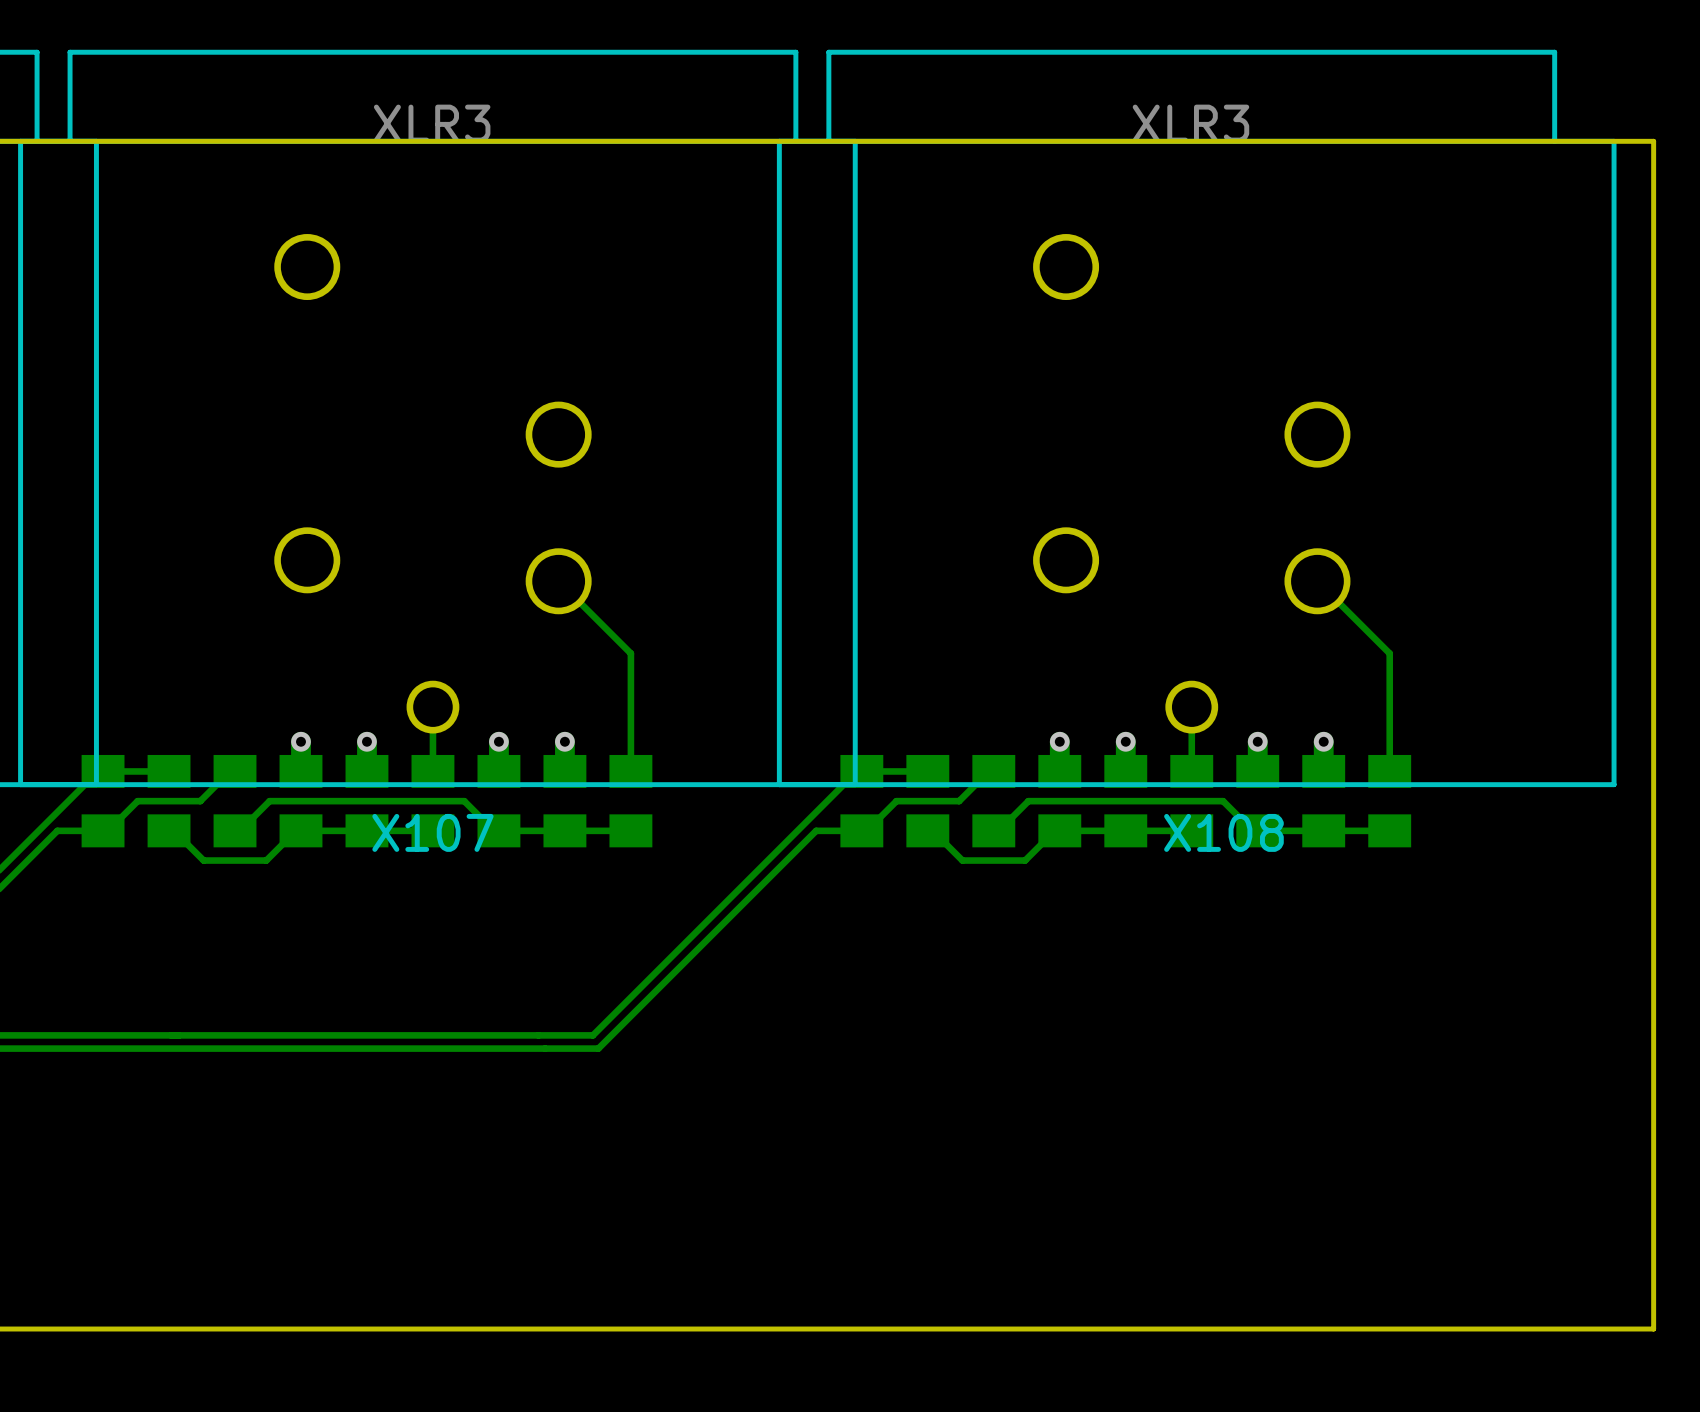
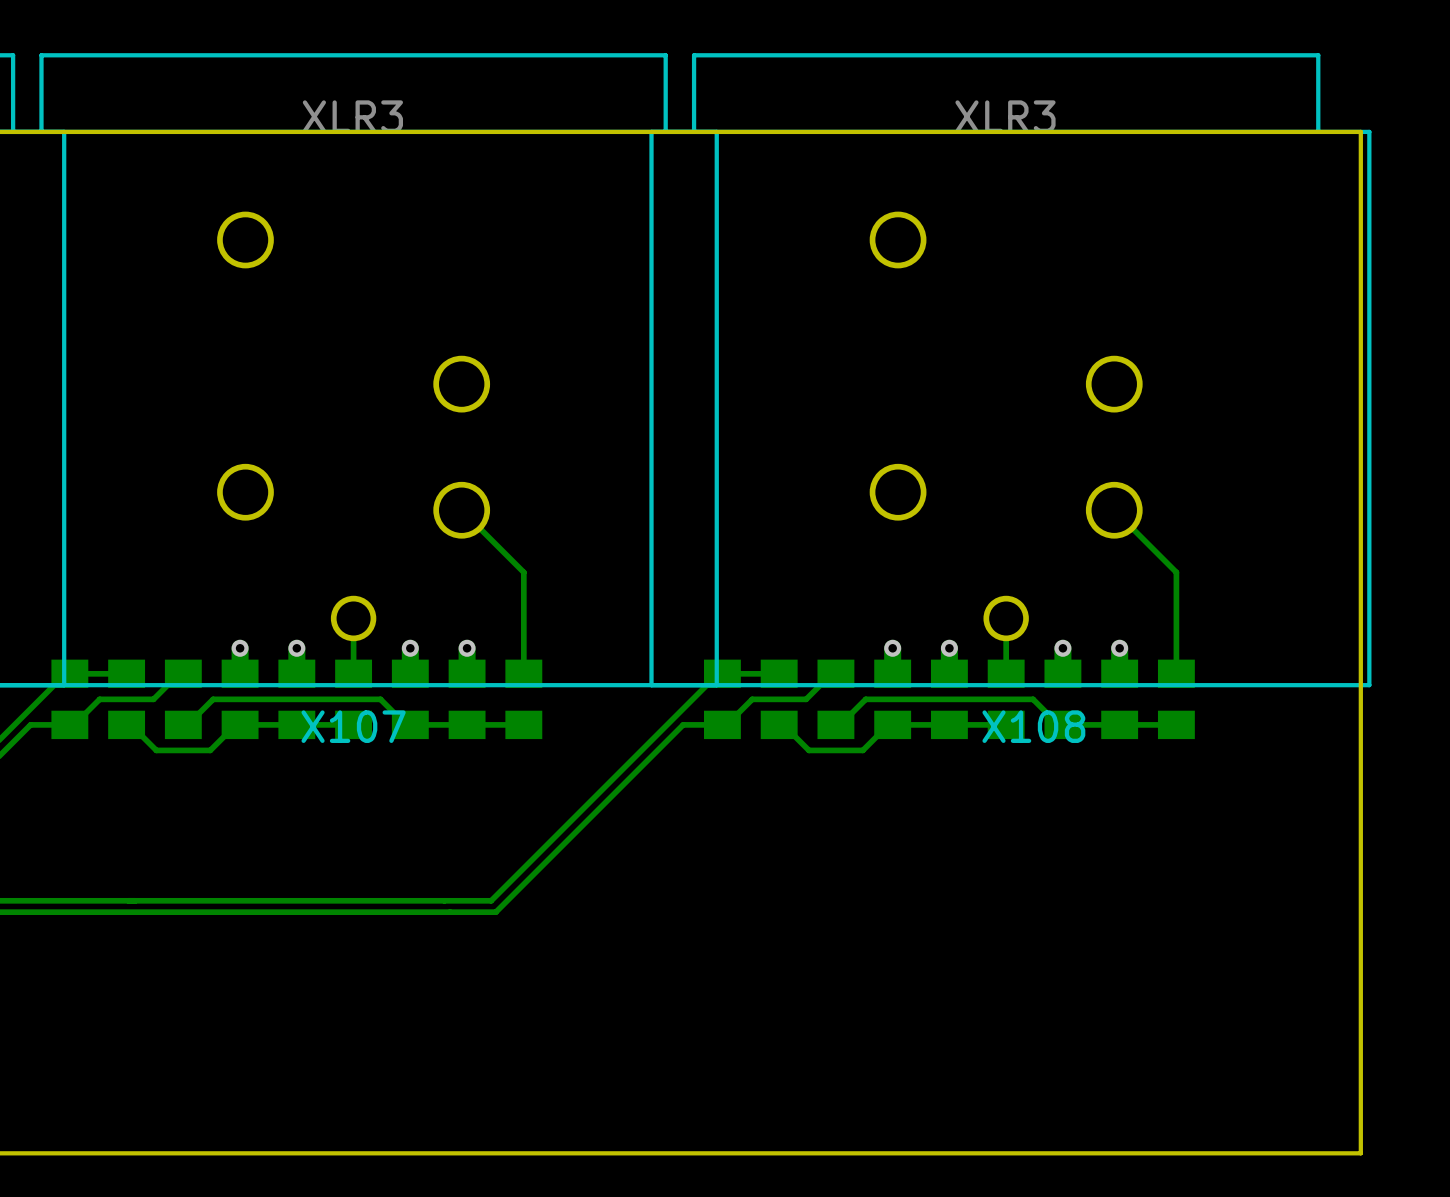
board edge: (1604, 141) (1653, 141) (1653, 1329) (1604, 1329) -> (1360, 131) (1360, 1153)

